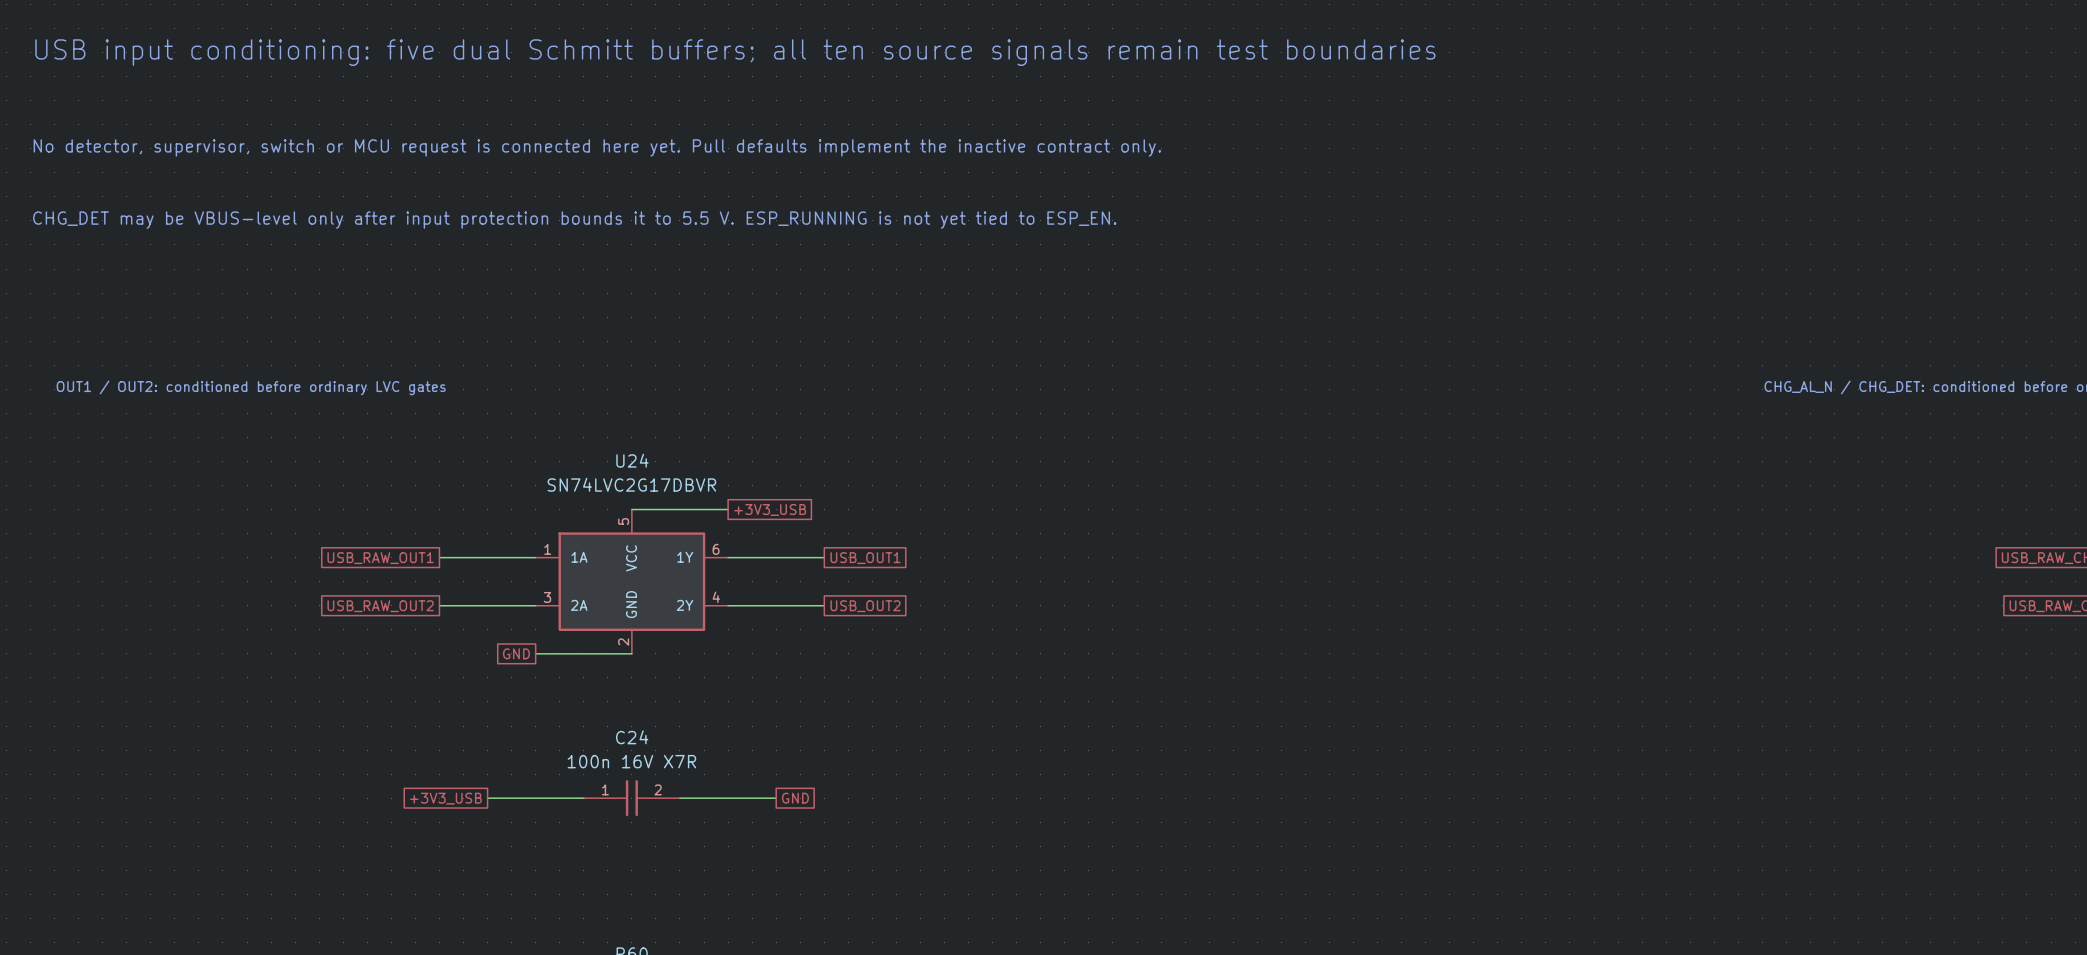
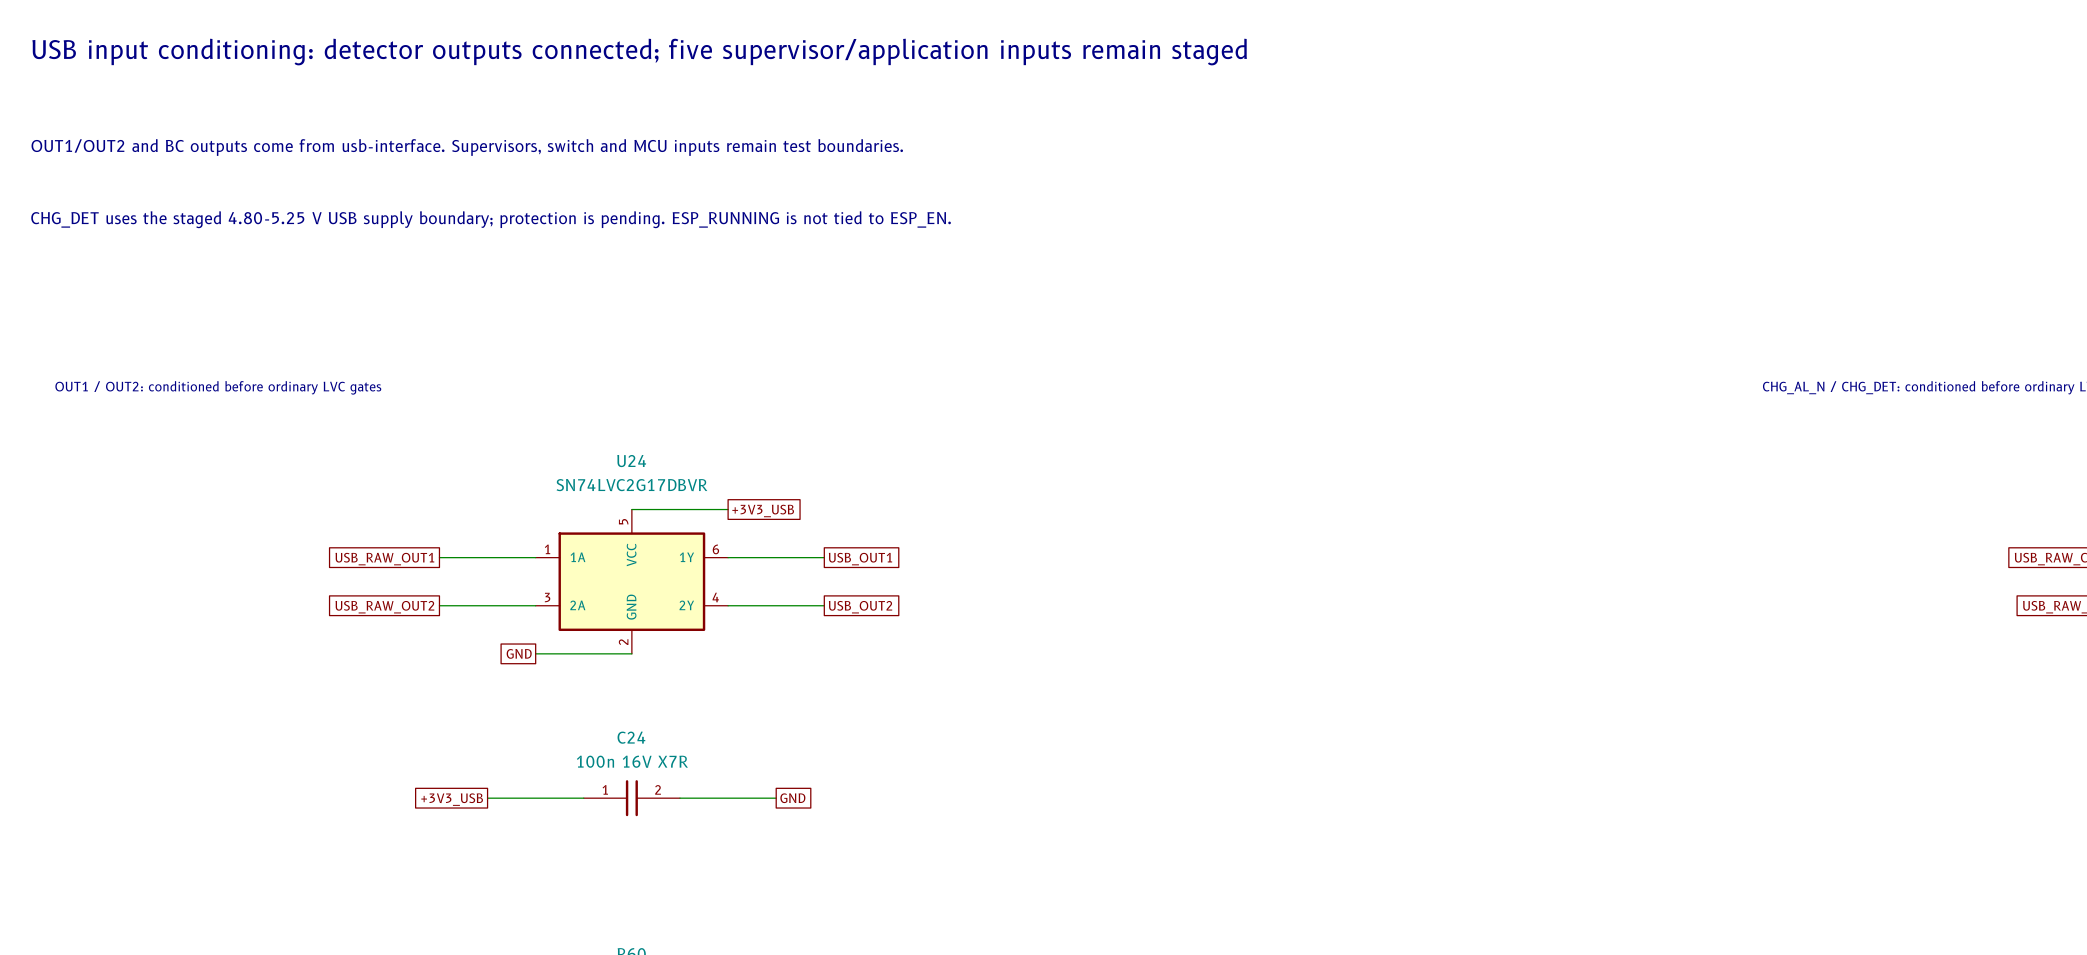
text: USB input conditioning: five dual Schmitt buffers; all ten source signals remain test boundaries (735, 52) -> USB input conditioning: detector outputs connected; five supervisor/application inputs remain staged (639, 52)
text: No detector, supervisor, switch or MCU request is connected here yet. Pull defaults implement the inactive contract only. (597, 147) -> OUT1/OUT2 and BC outputs come from usb-interface. Supervisors, switch and MCU inputs remain test boundaries. (467, 147)
text: CHG_DET may be VBUS-level only after input protection bounds it to 5.5 V. ESP_RUNNING is not yet tied to ESP_EN. (574, 220) -> CHG_DET uses the staged 4.80-5.25 V USB supply boundary; protection is pending. ESP_RUNNING is not tied to ESP_EN. (491, 219)

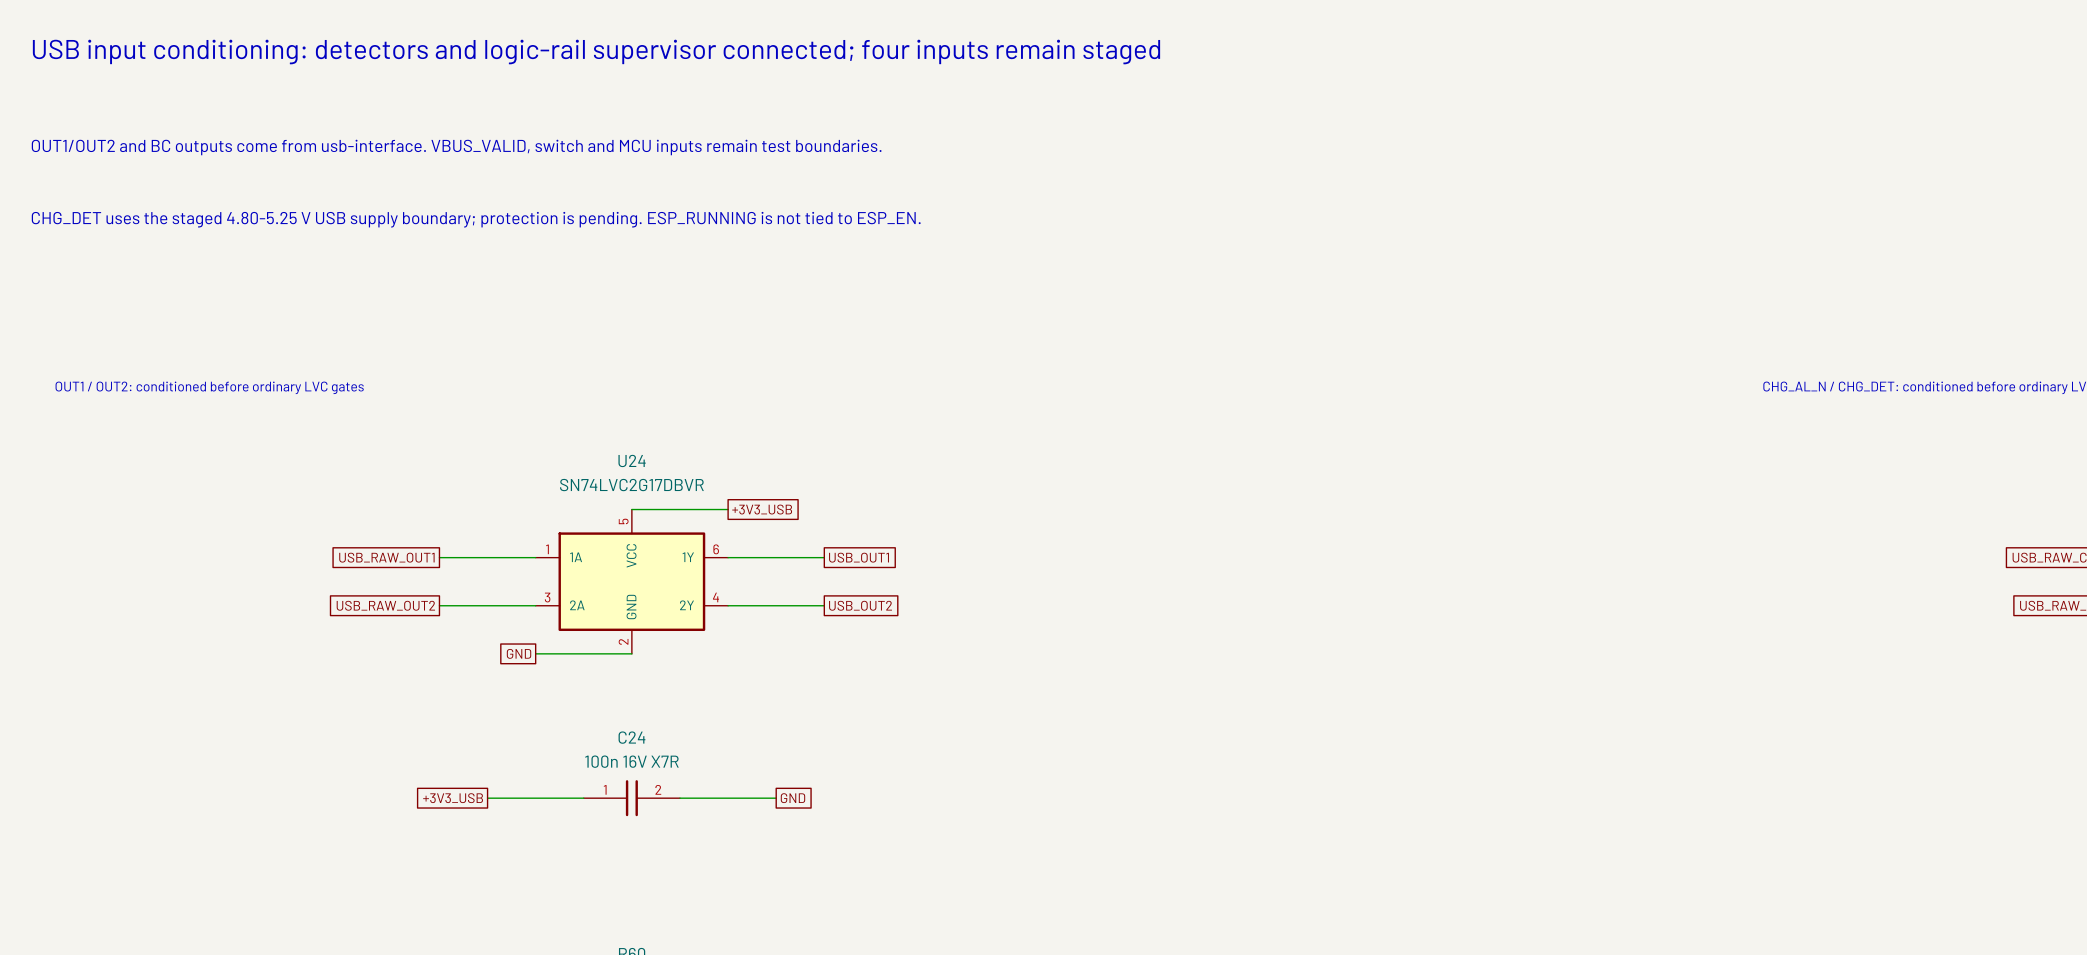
text: USB input conditioning: detector outputs connected; five supervisor/application inputs remain staged (639, 52) -> USB input conditioning: detectors and logic-rail supervisor connected; four inputs remain staged (596, 52)
text: OUT1/OUT2 and BC outputs come from usb-interface. Supervisors, switch and MCU inputs remain test boundaries. (467, 147) -> OUT1/OUT2 and BC outputs come from usb-interface. VBUS_VALID, switch and MCU inputs remain test boundaries. (456, 147)

